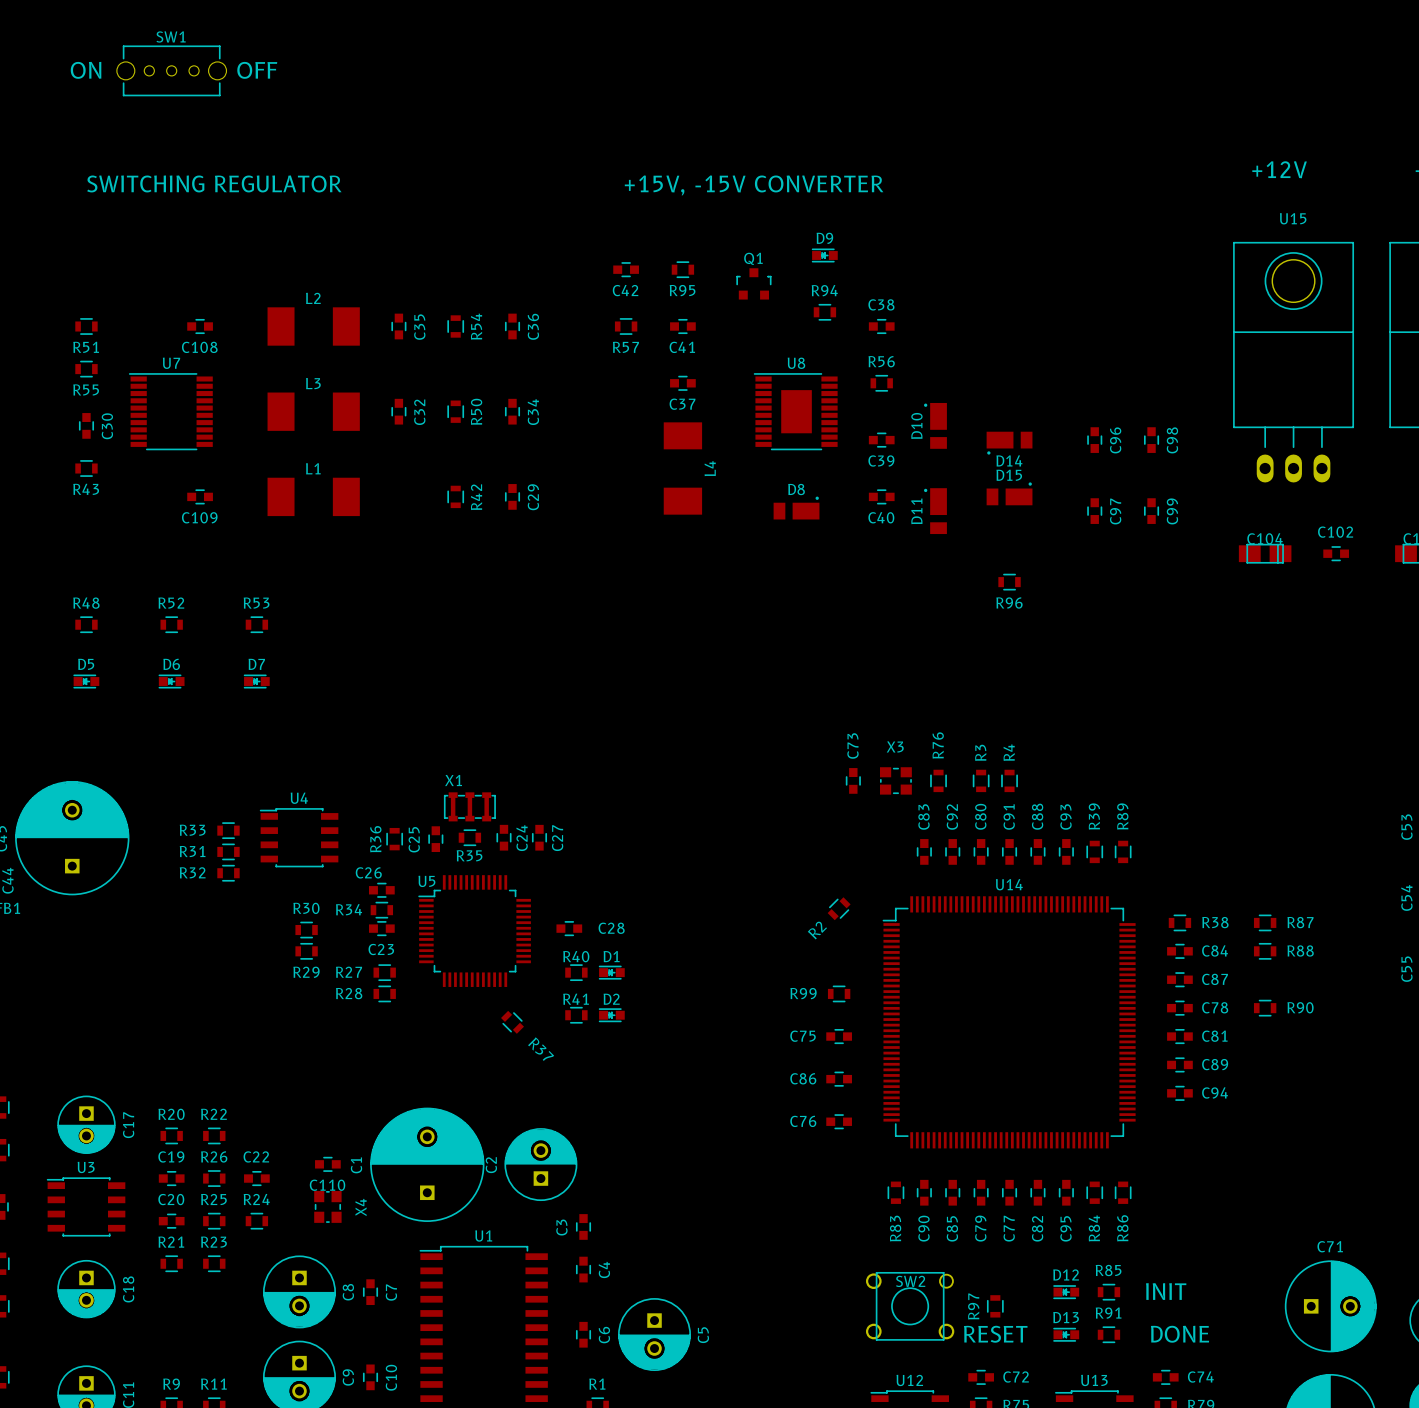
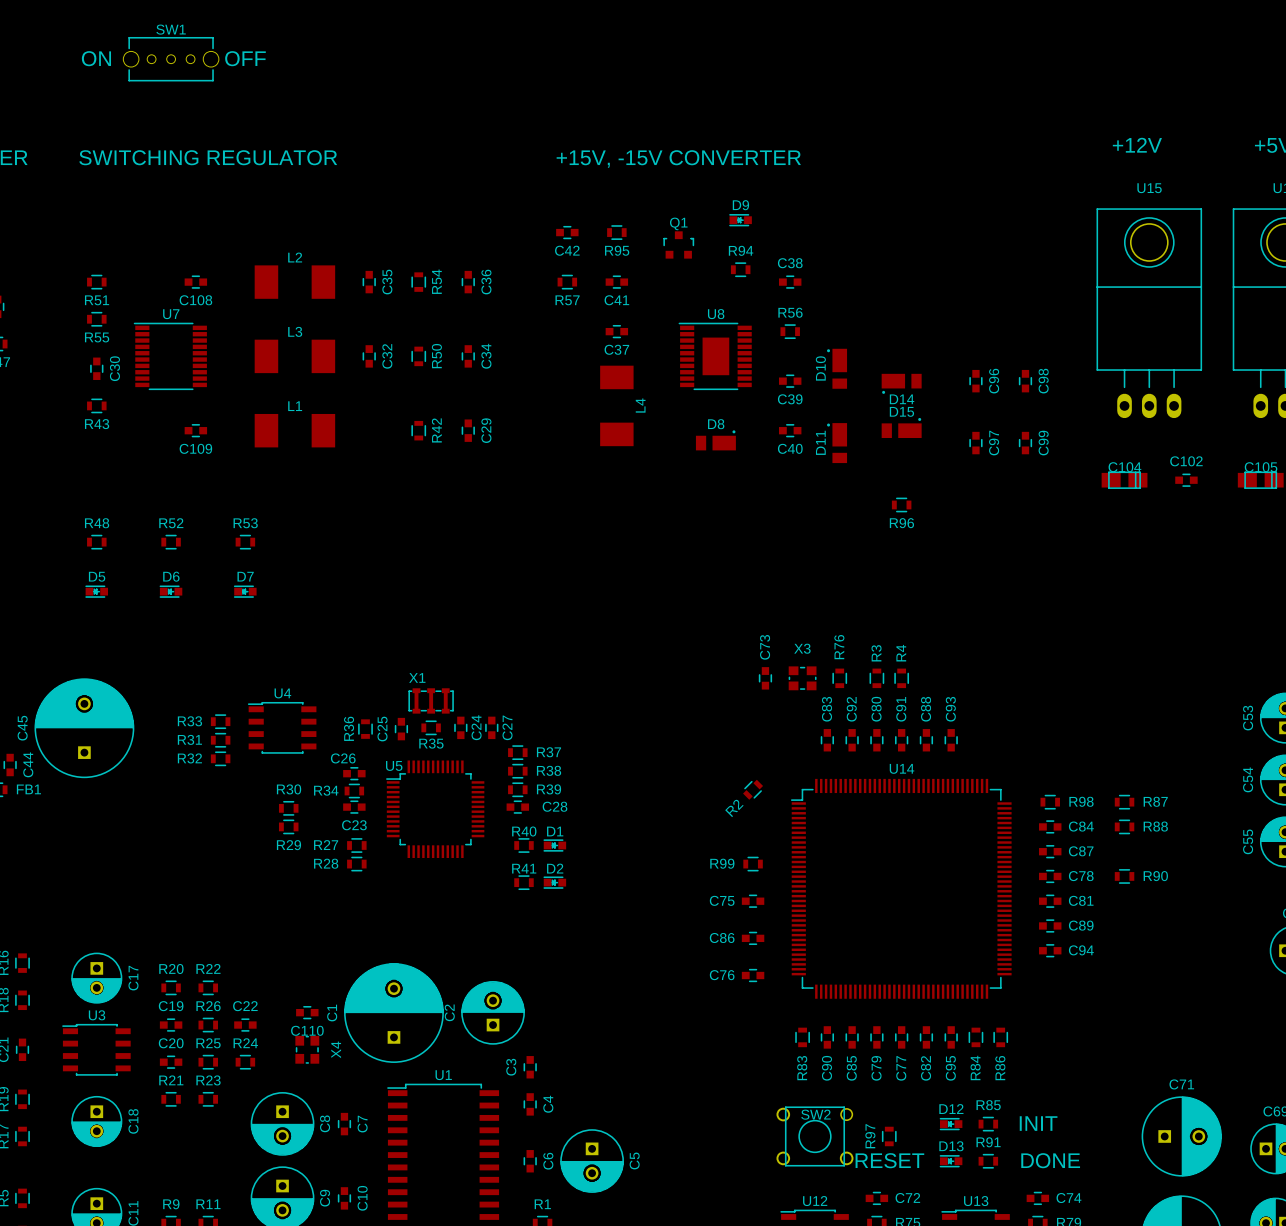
R39 rotation: 0° (1094, 851) -> 90° clockwise (517, 789)
R39 position: (1094, 851) -> (517, 789)
R89: (1123, 851) -> none
R38: none -> (517, 771)
R38 name: R38 (1215, 922) -> R98 (1081, 801)
R37 rotation: 0° (512, 1022) -> 45° counterclockwise (517, 752)
R37 position: (512, 1022) -> (517, 752)

